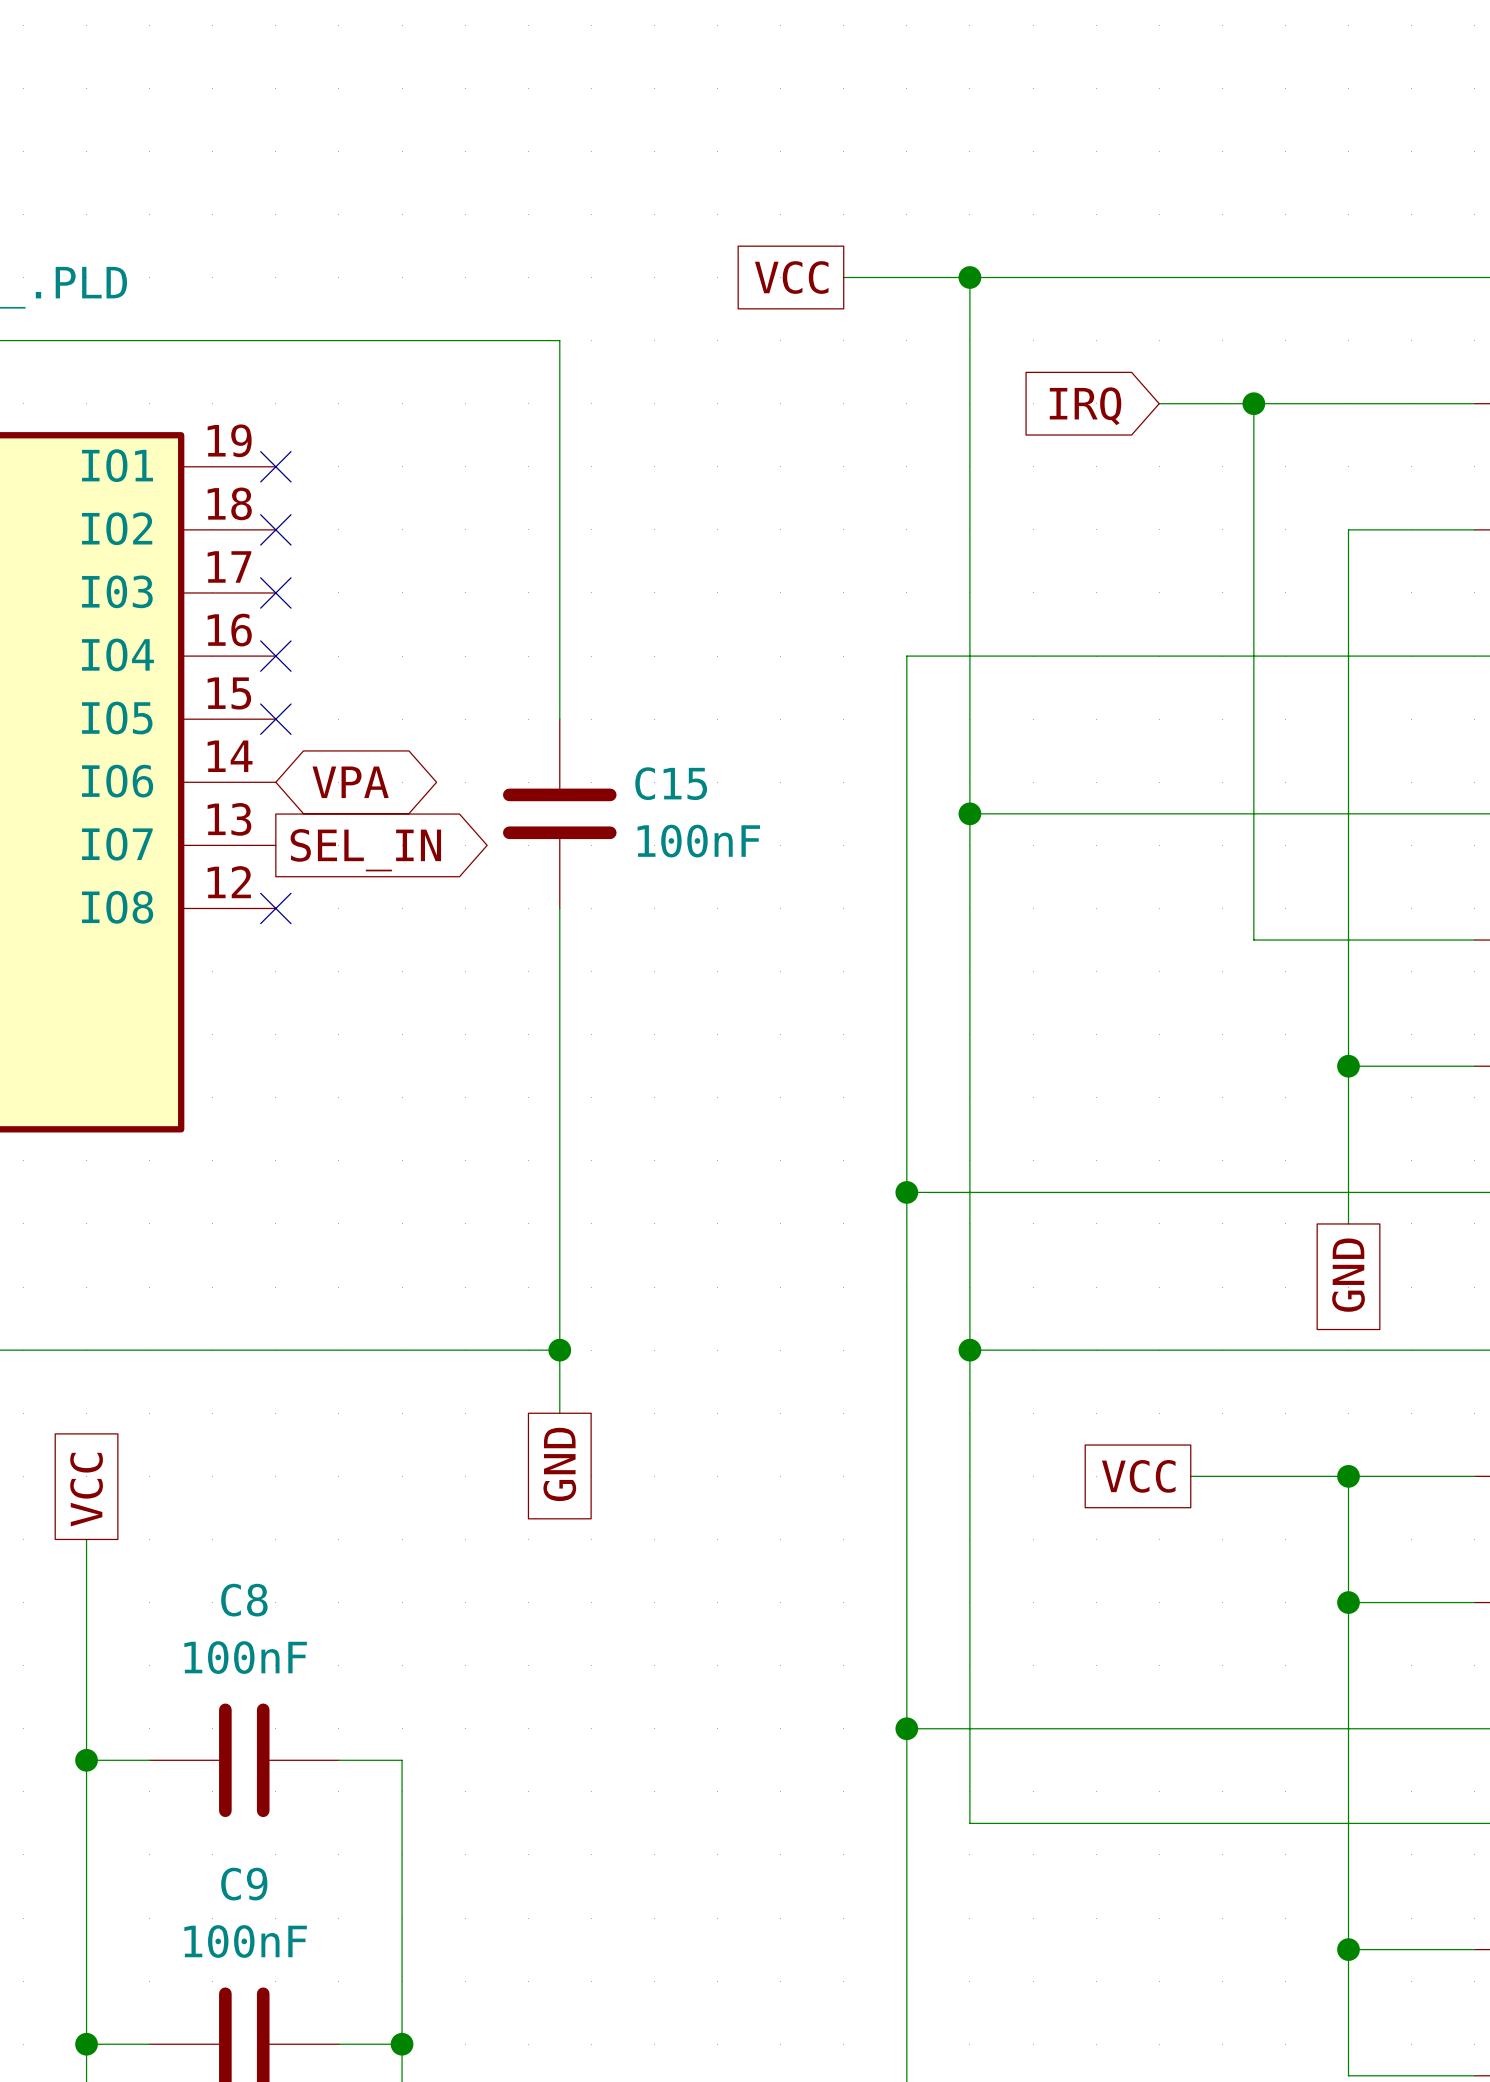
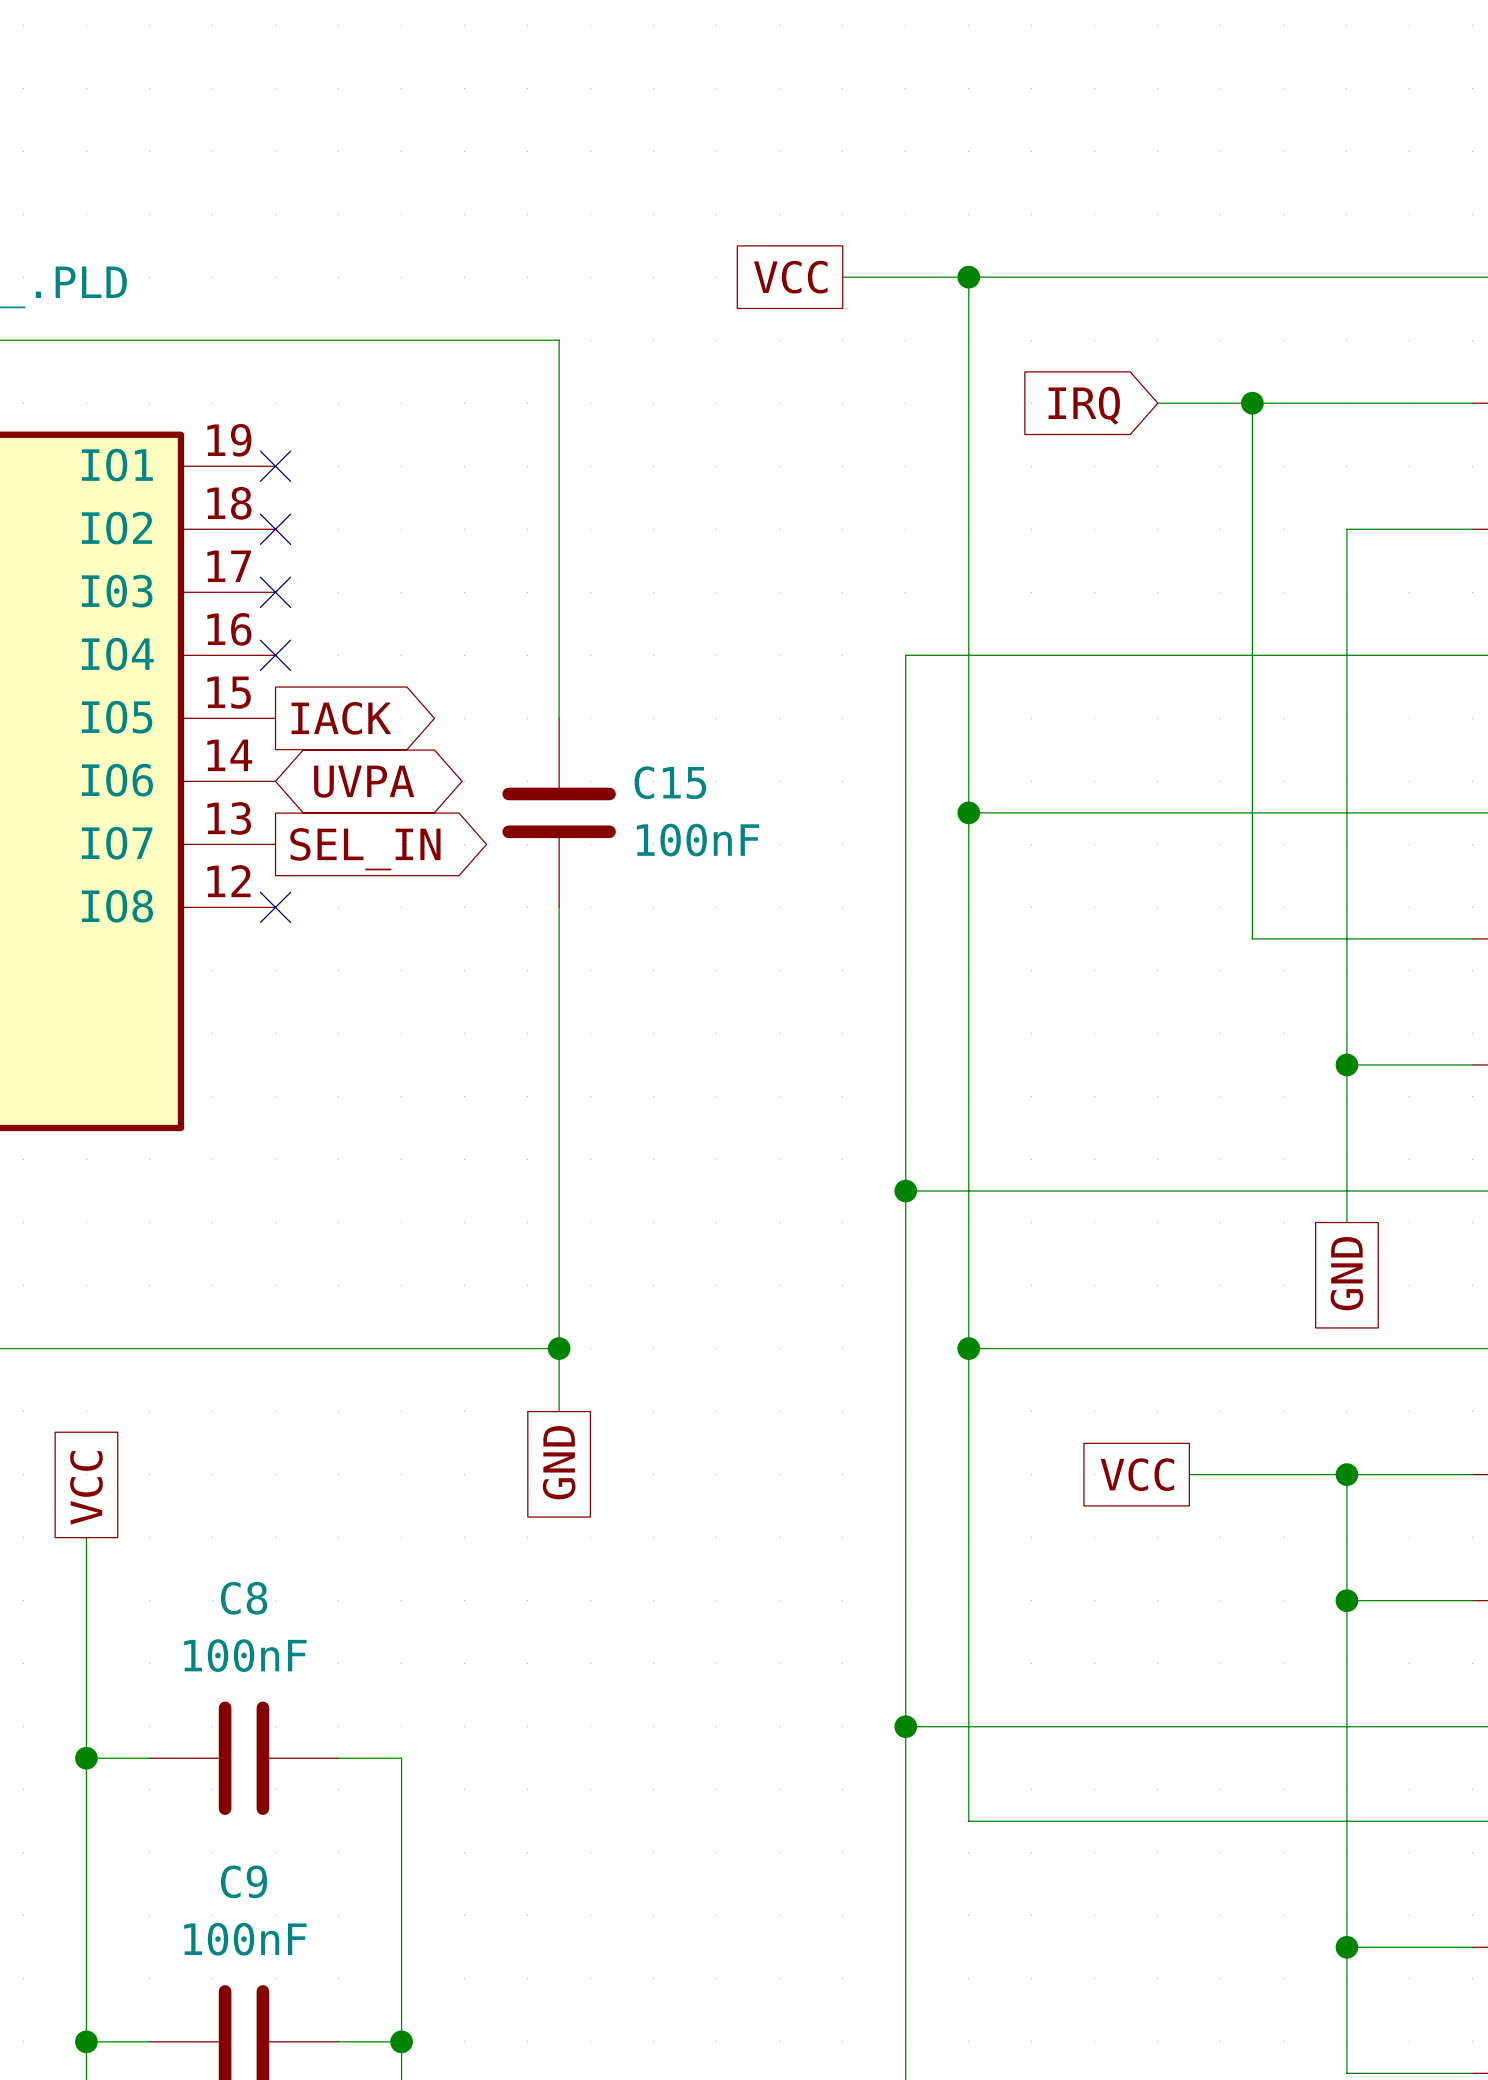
no-connect mark: (275, 719) -> none
global label: none -> IACK (341, 718)
global label: VPA (350, 782) -> UVPA (364, 781)

